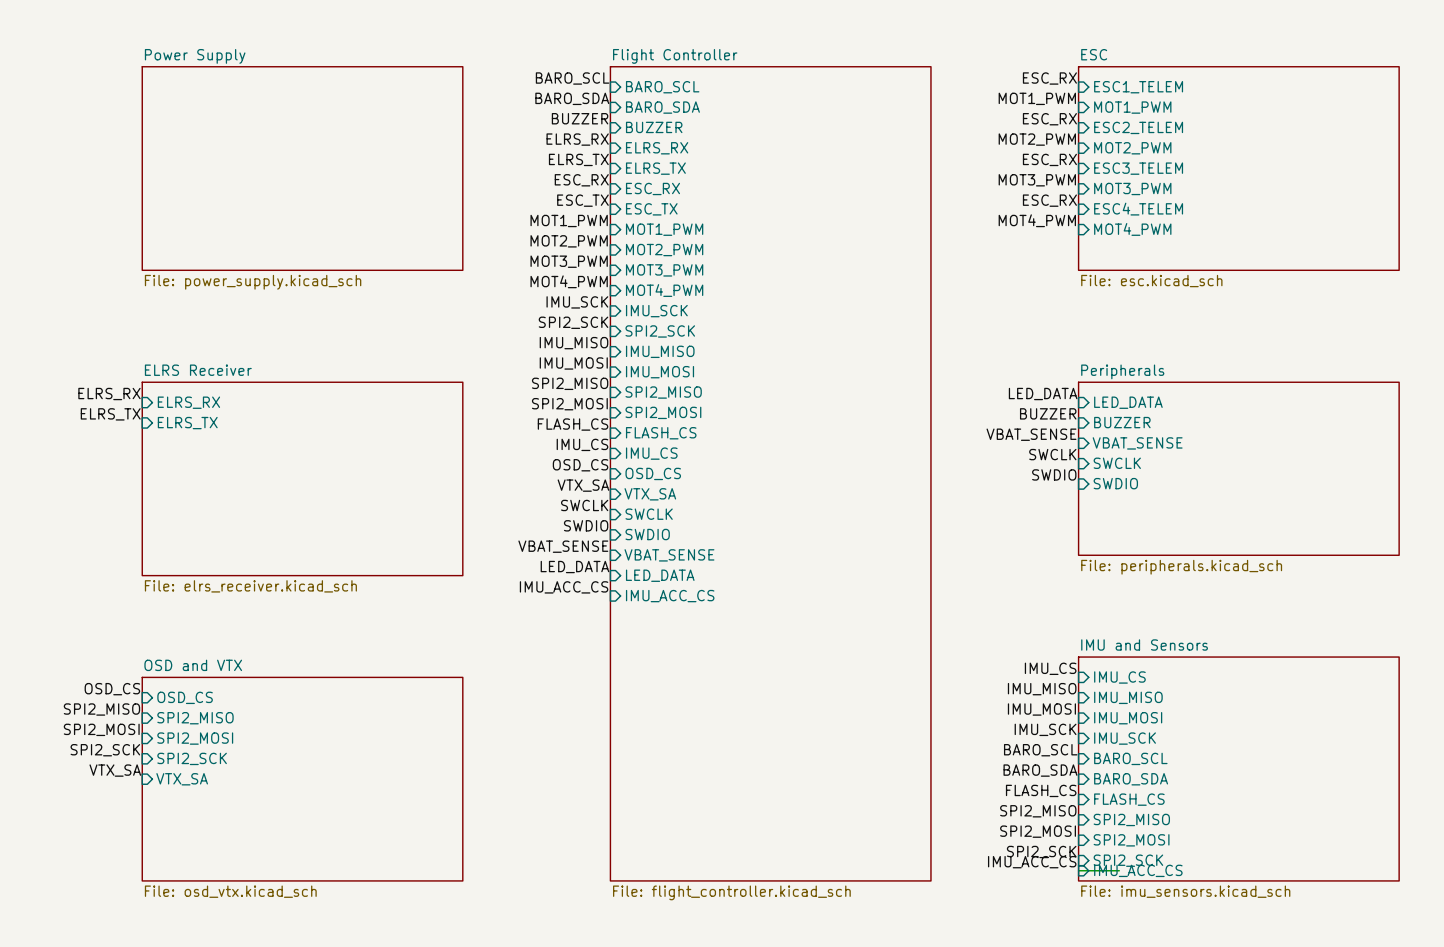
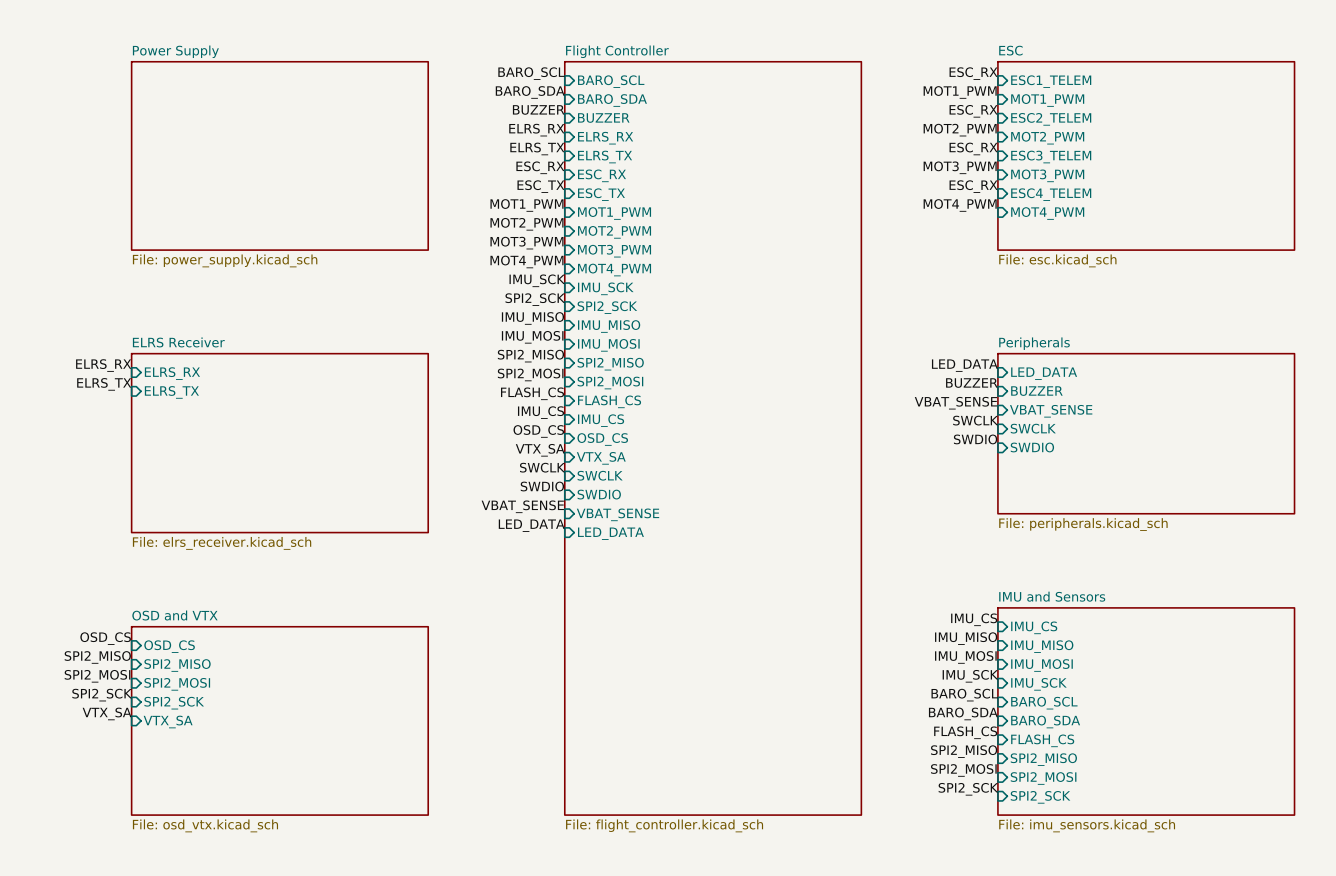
label: IMU_ACC_CS (564, 587) -> none
sheet pin: IMU_ACC_CS (670, 596) -> none
label: IMU_ACC_CS (1032, 862) -> none
wire: (1078, 870) (1119, 870) -> none
sheet pin: IMU_ACC_CS (1138, 870) -> none

